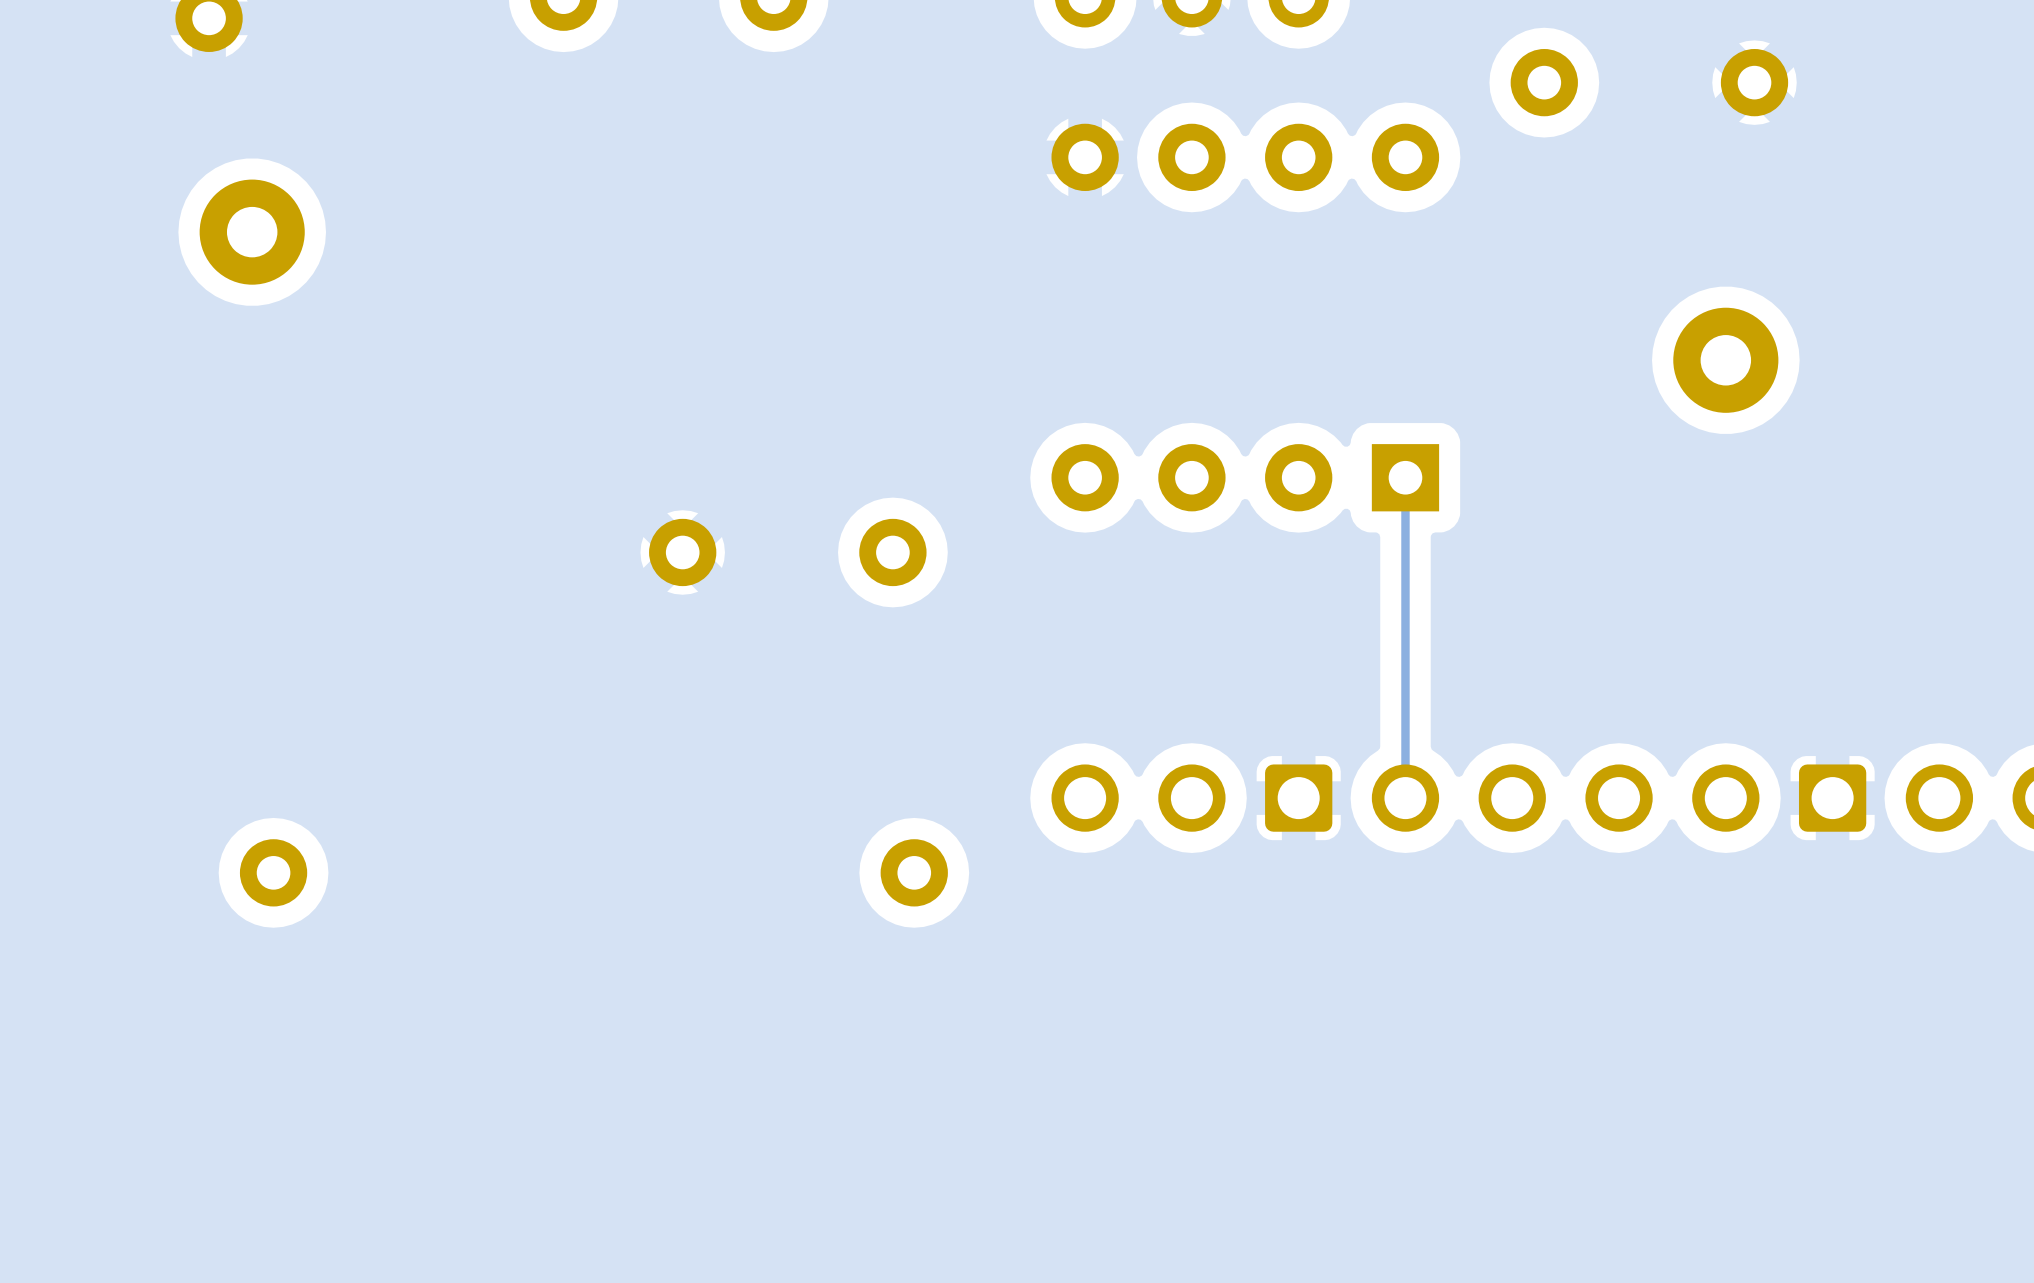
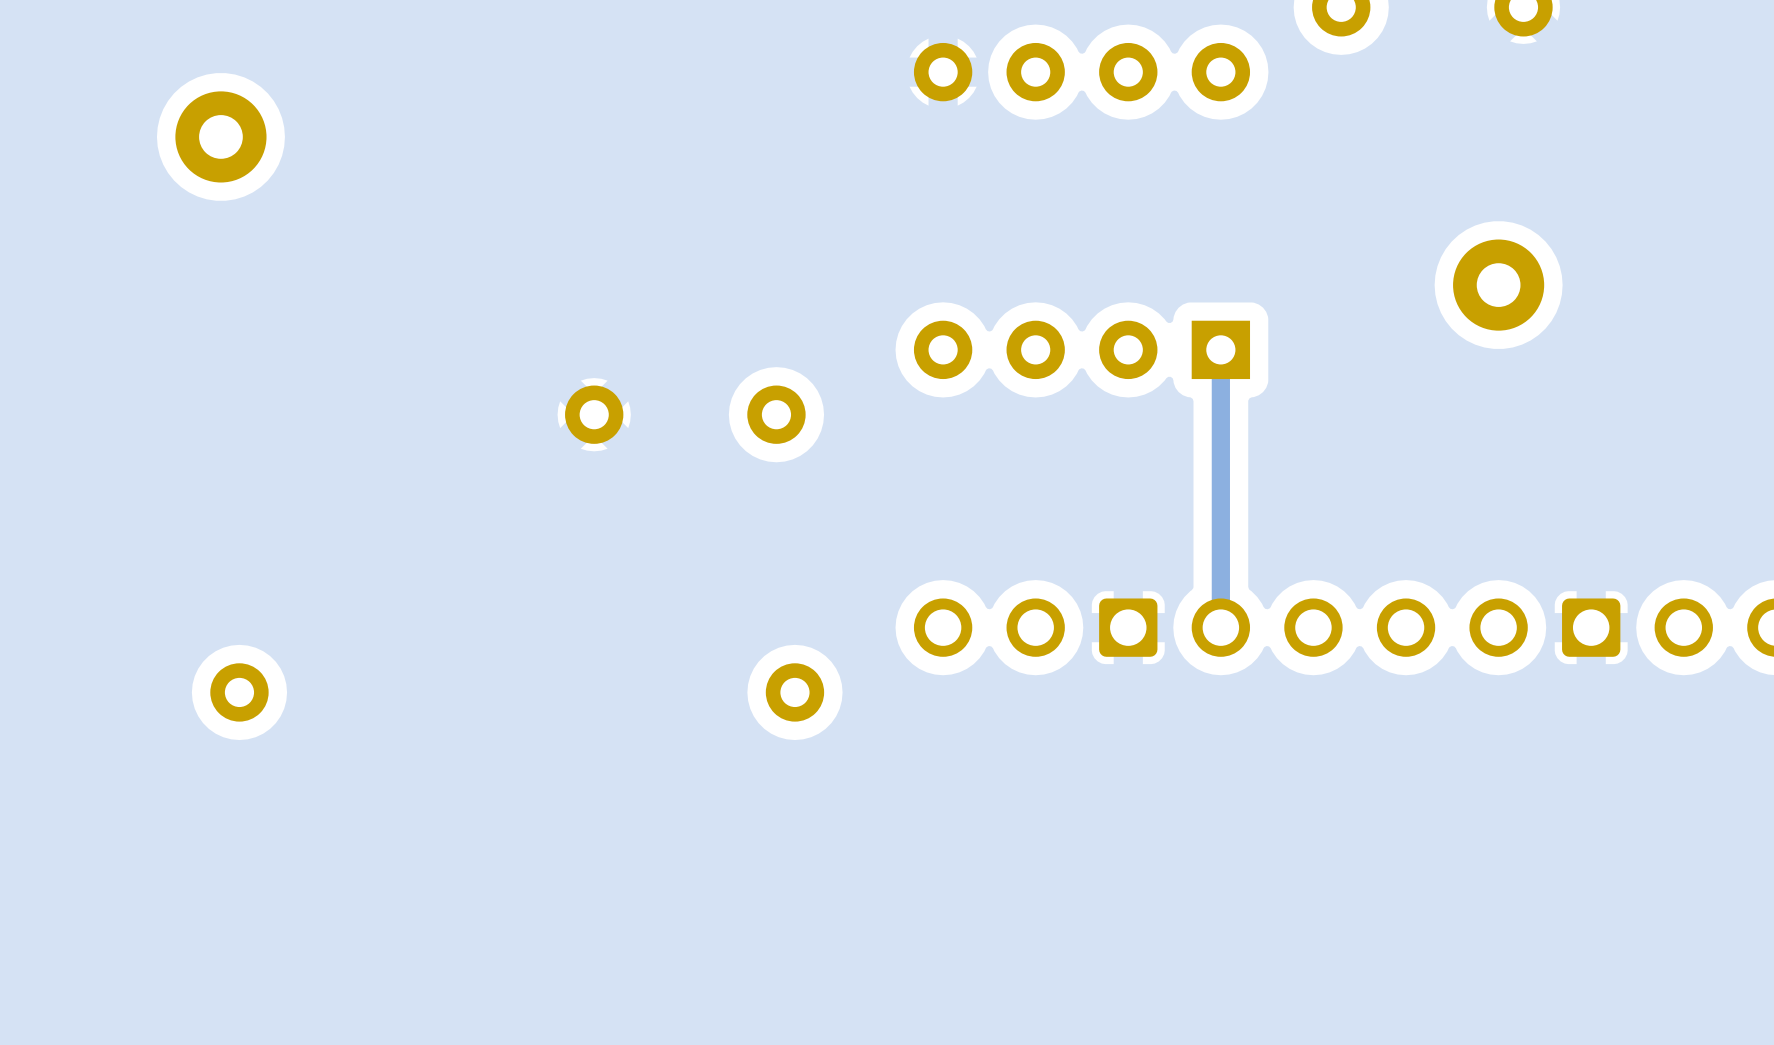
part position: (1725, 360) -> (1498, 285)
track width: thin (1405, 477) (1405, 798) -> thick (1220, 349) (1220, 627)

